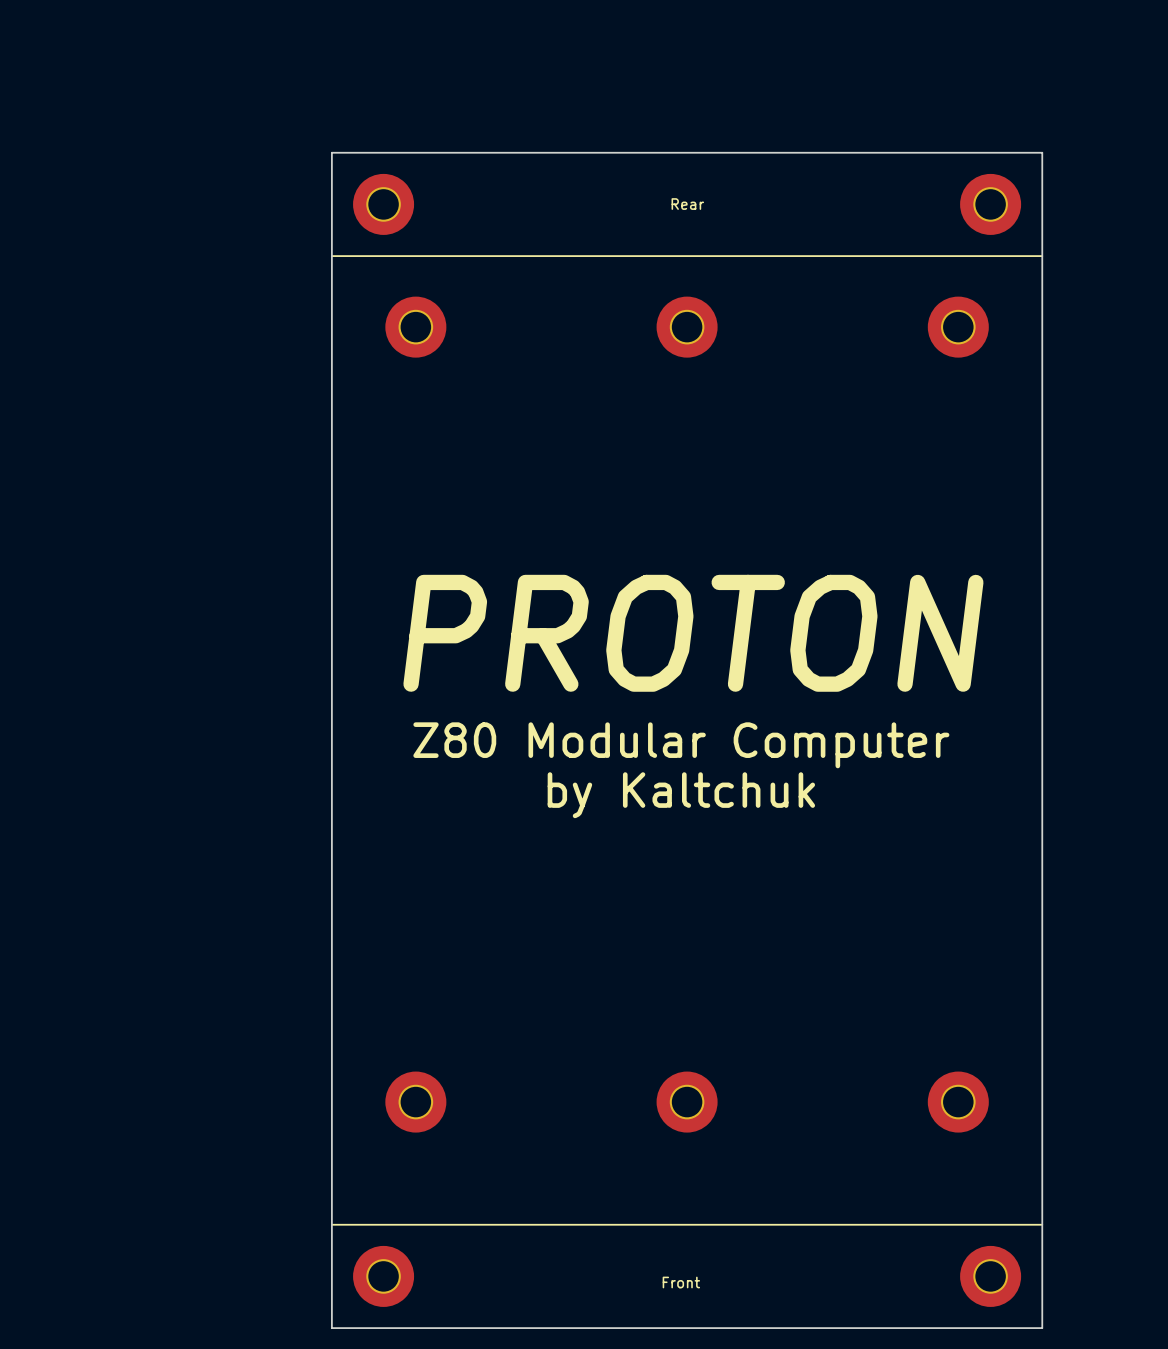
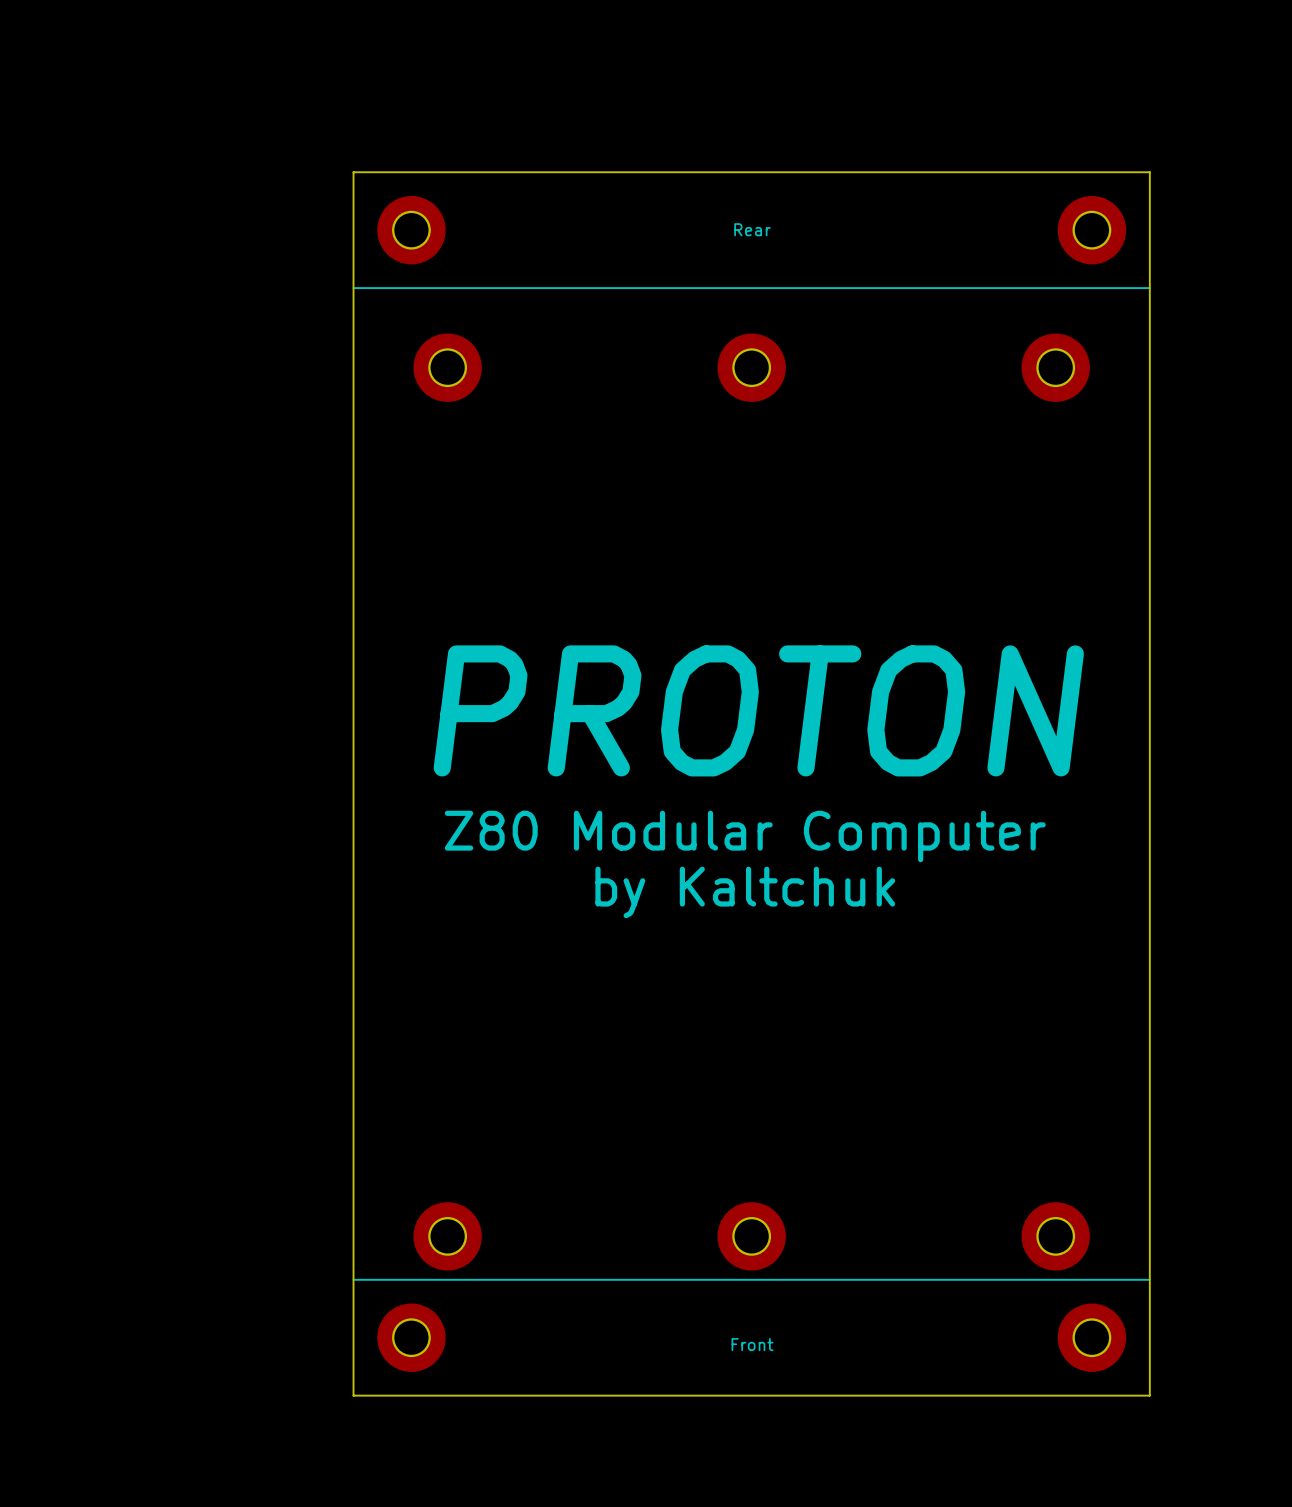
line: (331, 1224) (1042, 1224) -> (353, 1279) (1149, 1279)
board edge: (331, 1244) (331, 1328) (1042, 1328) (1042, 1244) -> (353, 1395) (1149, 1395)
part position: (383, 1276) -> (411, 1337)
part position: (990, 1276) -> (1091, 1337)
text position: Front (681, 1282) -> Front (752, 1344)

